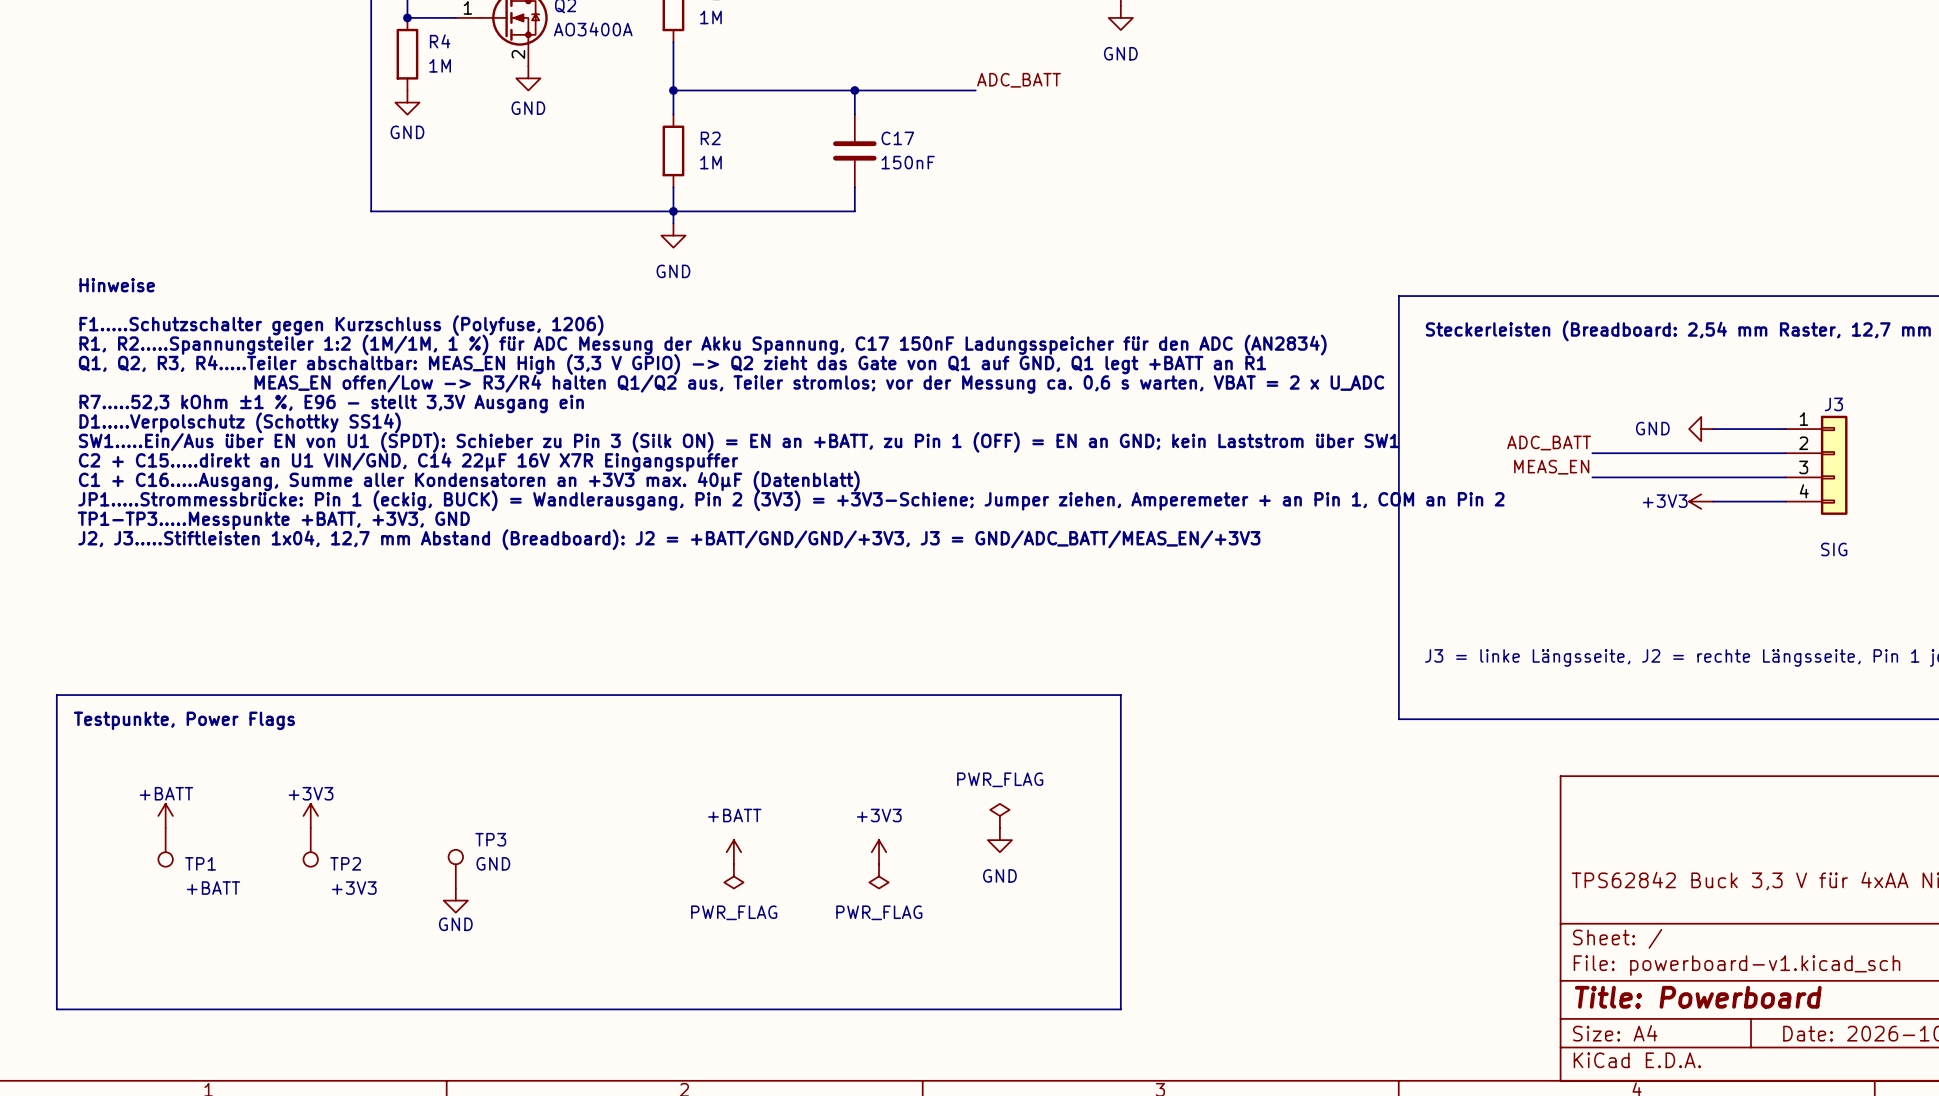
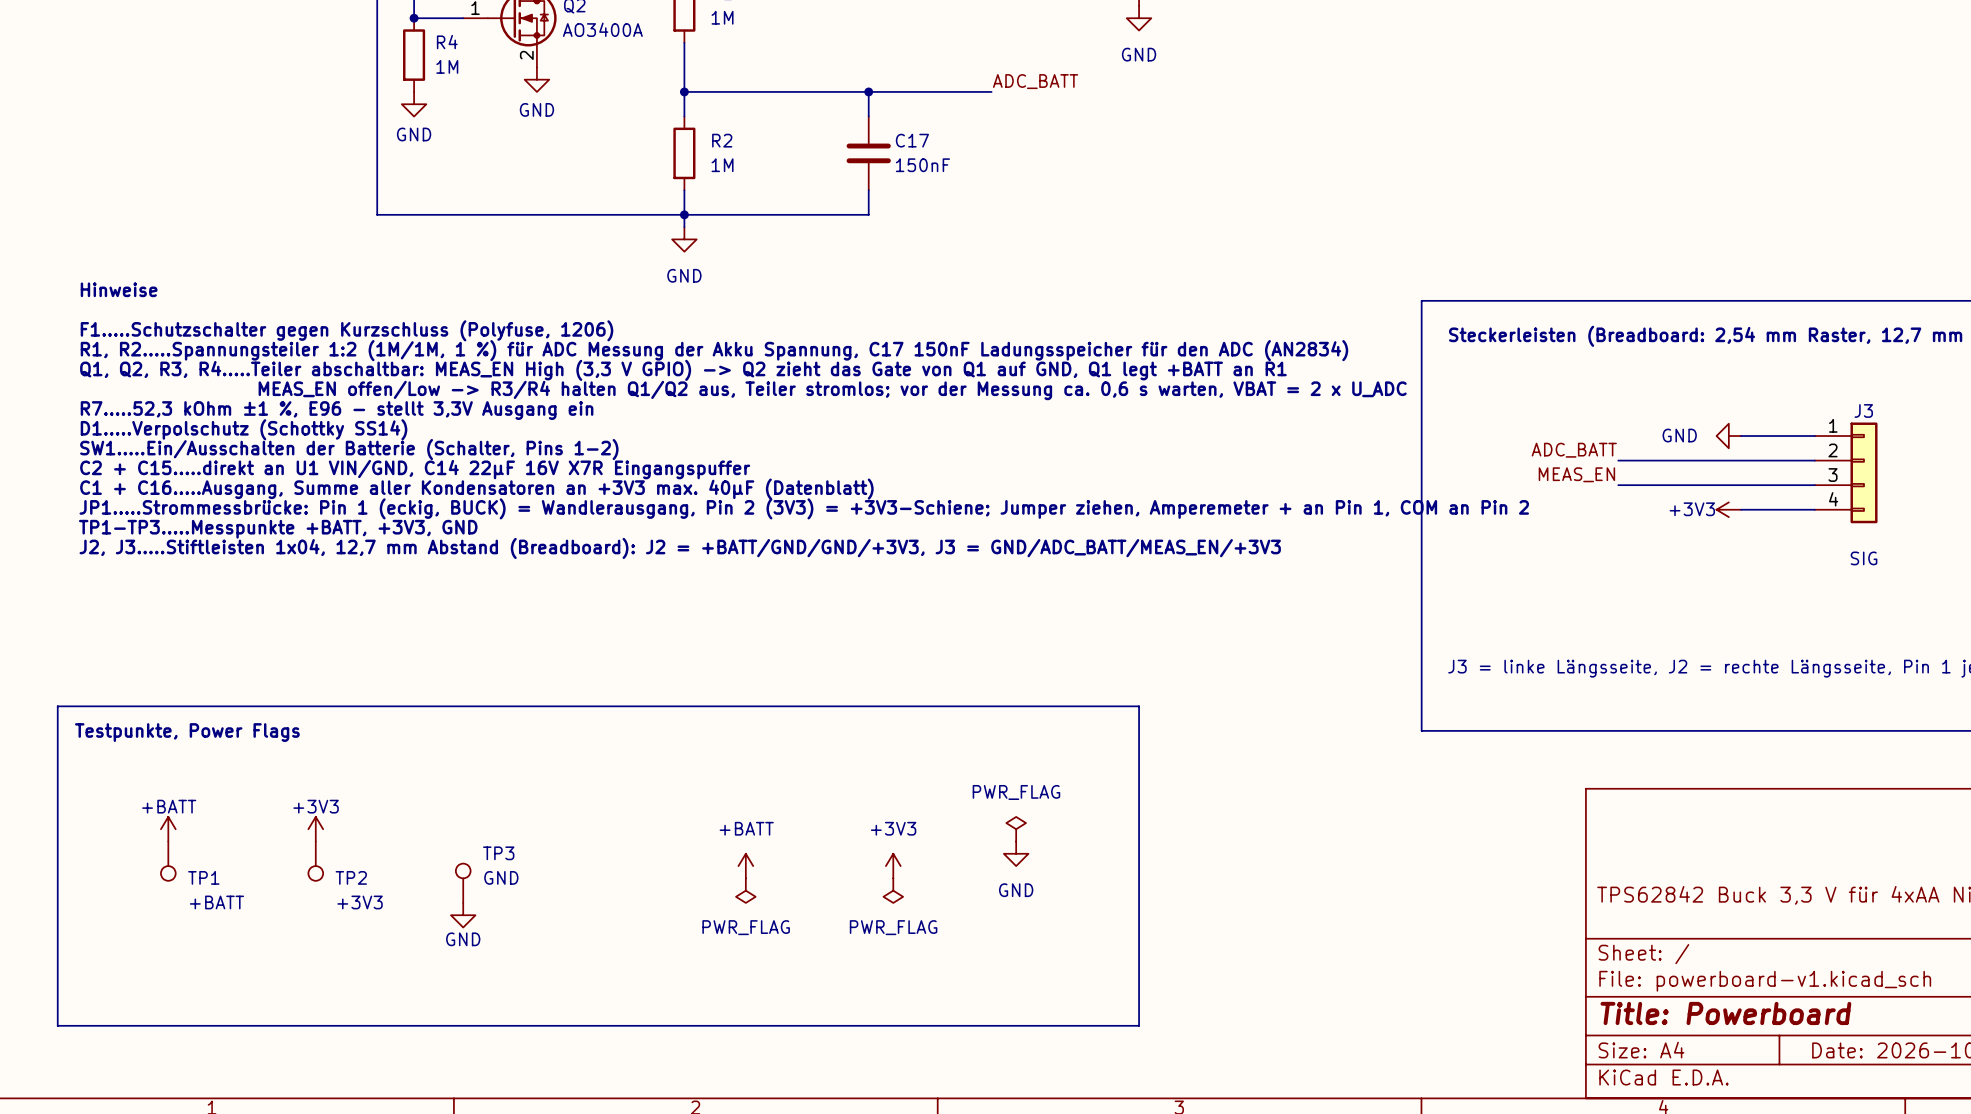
text: SW1.....Ein/Aus über EN von U1 (SPDT): Schieber zu Pin 3 (Silk ON) = EN an +BATT, zu Pin 1 (OFF) = EN an GND; kein Laststrom über SW1 (739, 442) -> SW1.....Ein/Ausschalten der Batterie (Schalter, Pins 1-2) (349, 449)

